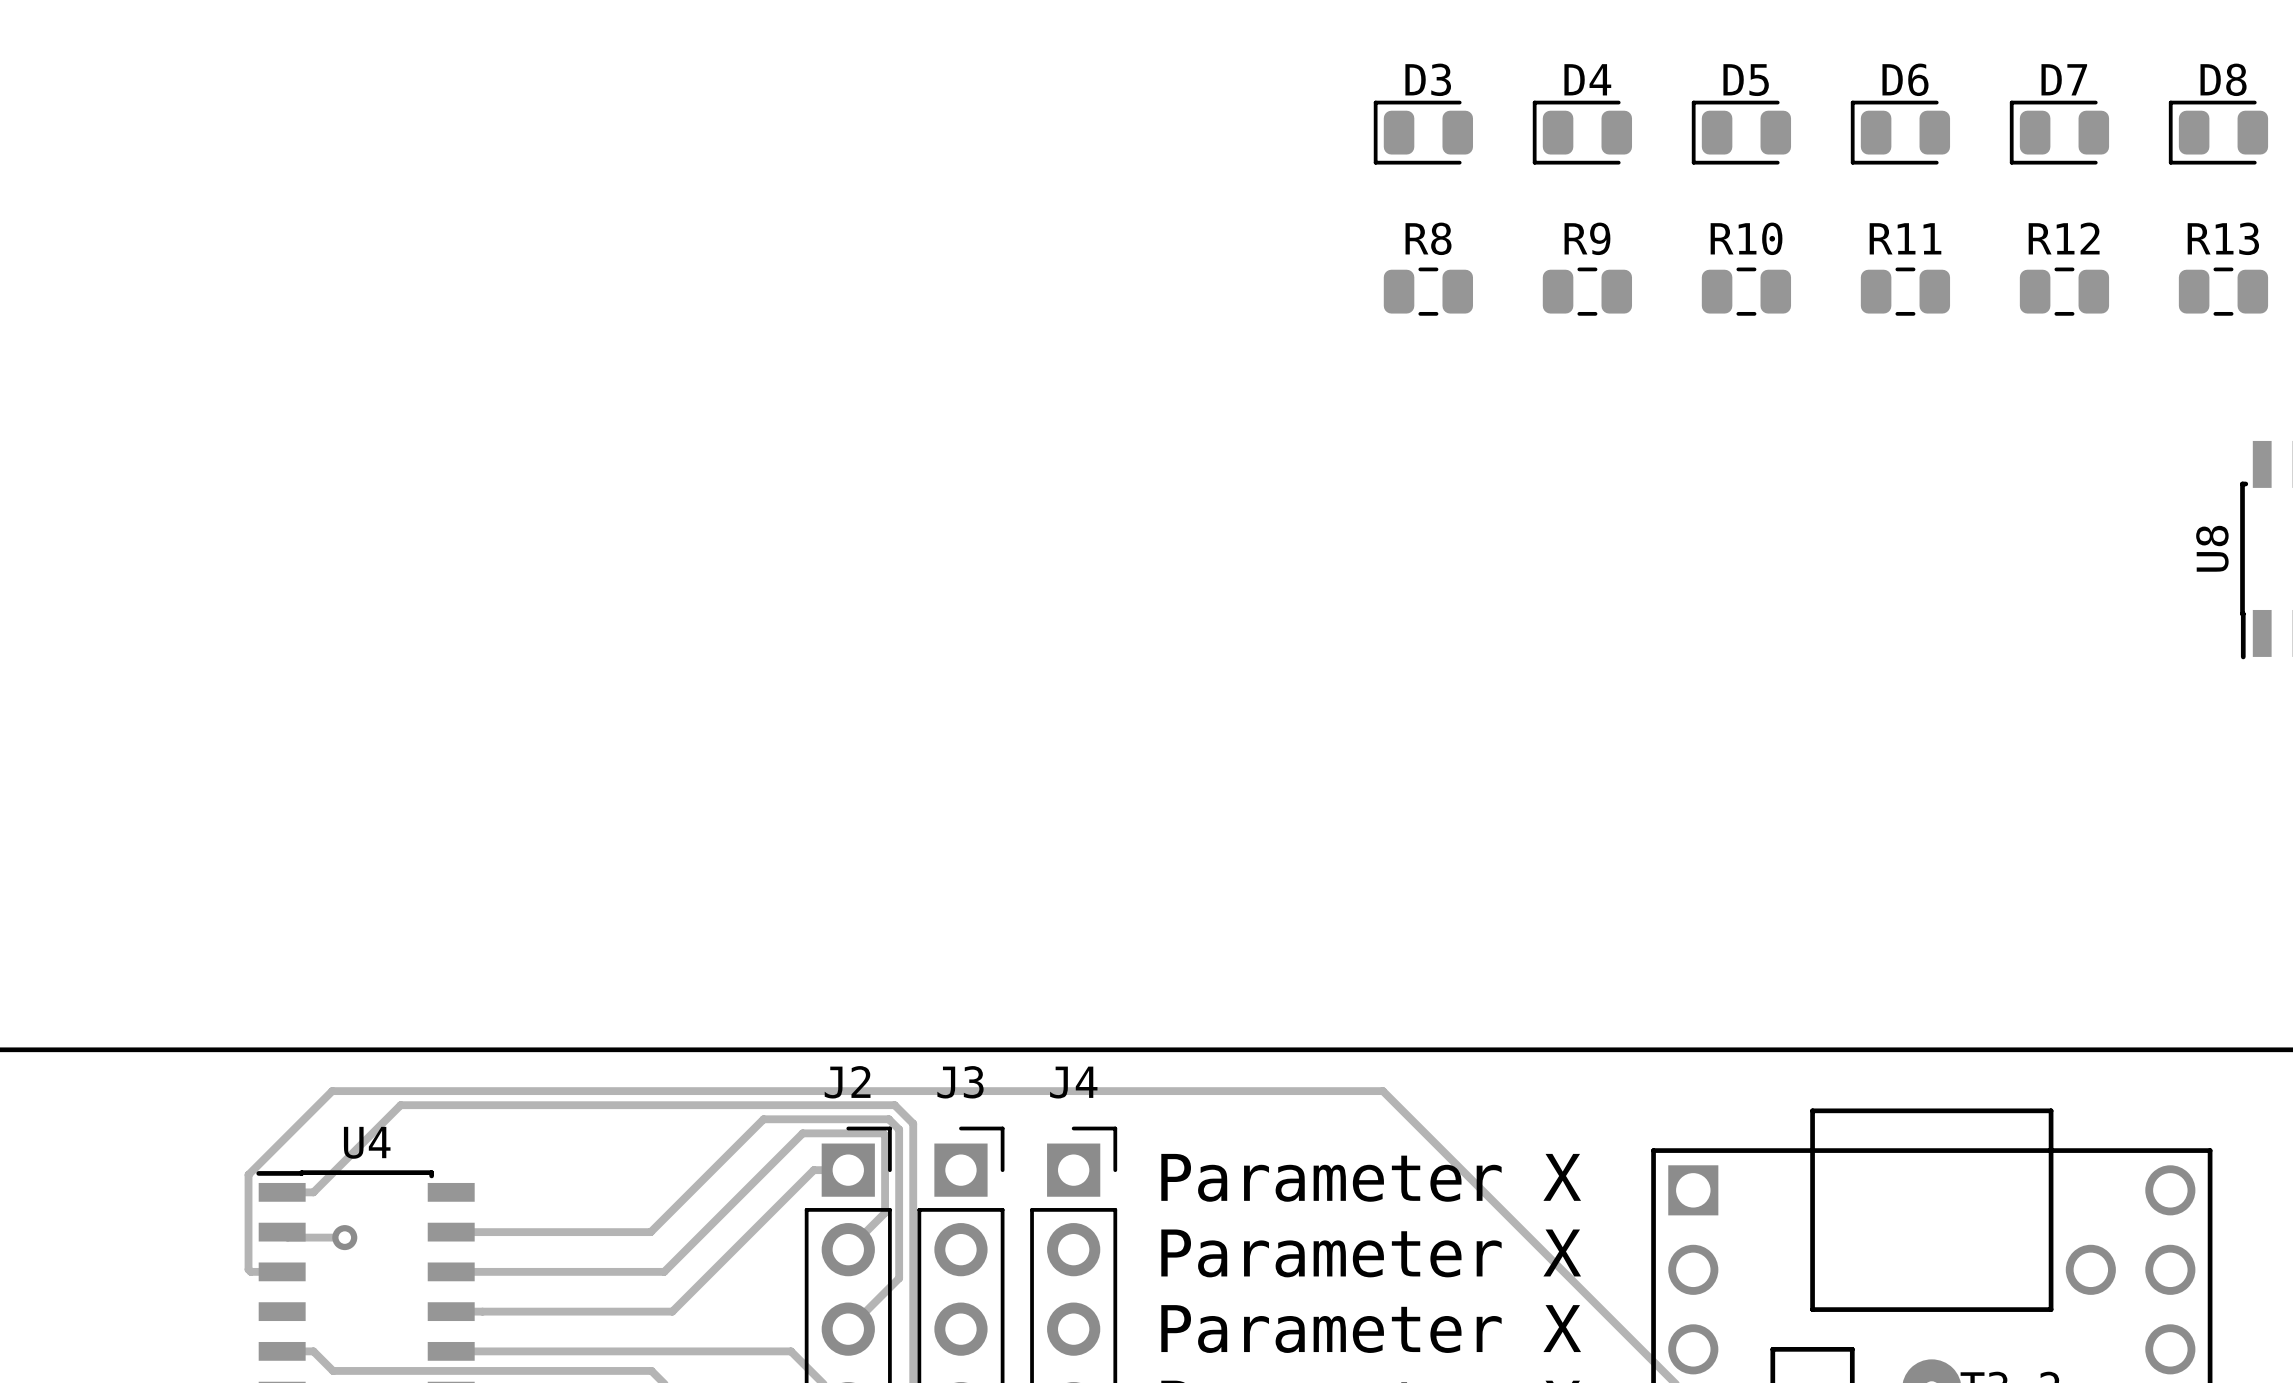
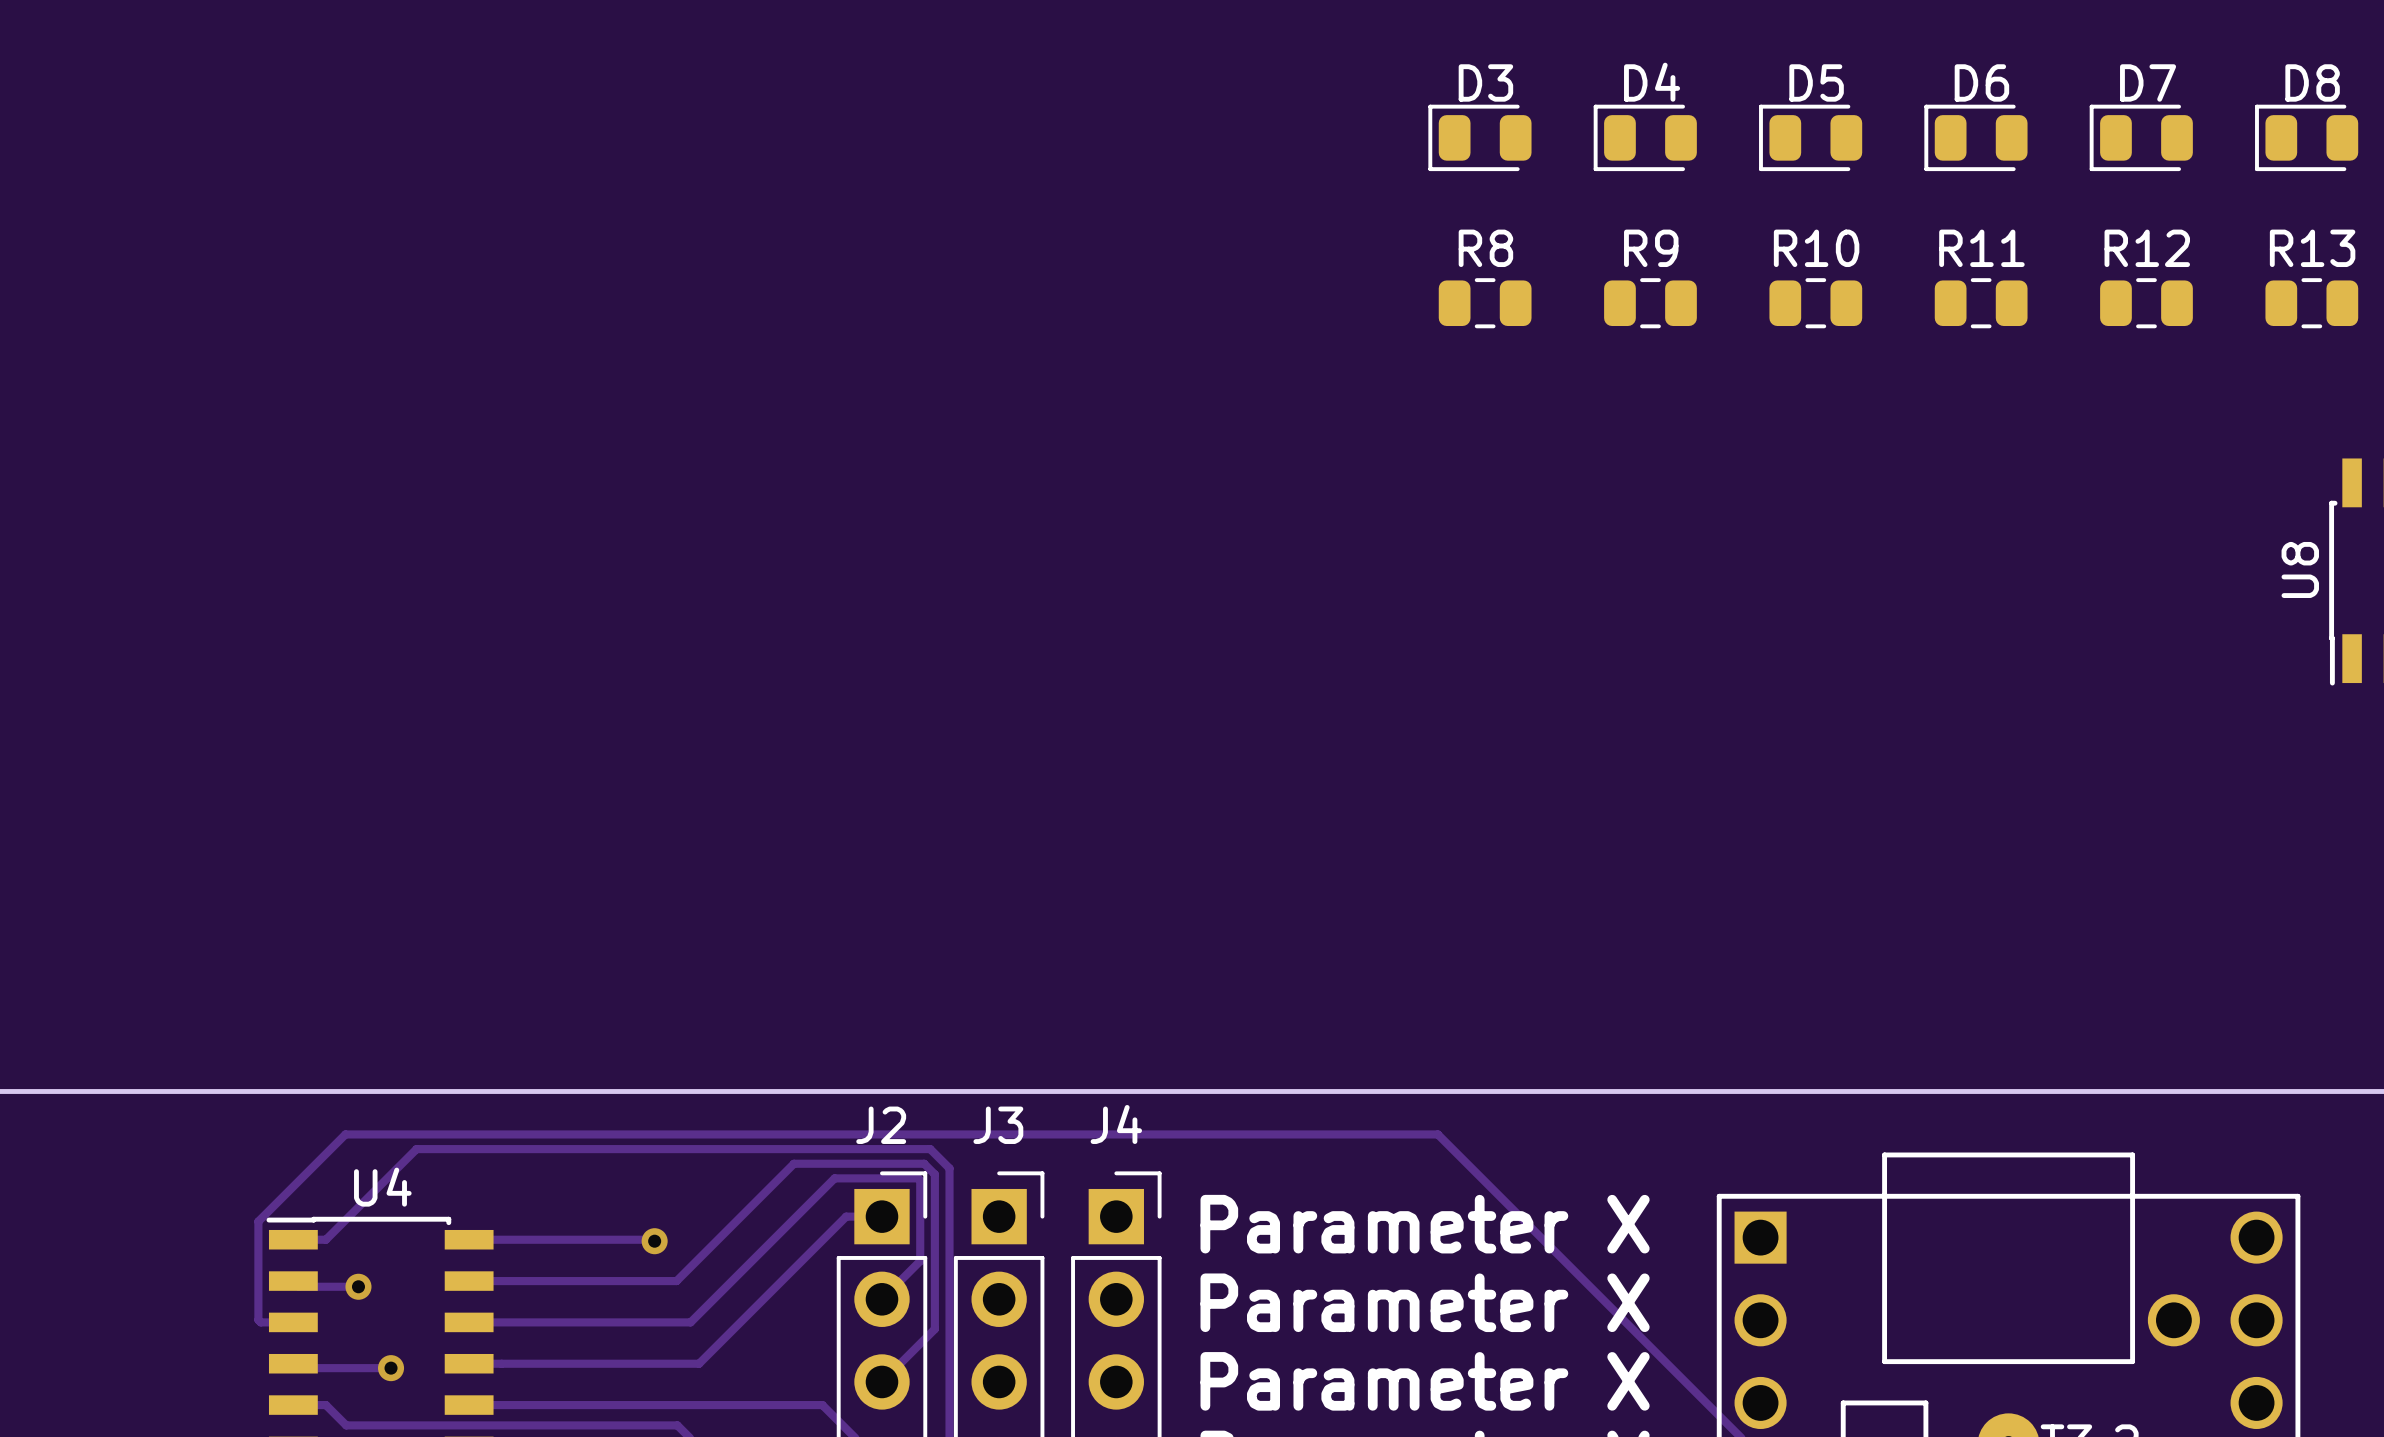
track: none -> (469, 1239) (654, 1241)
via: none -> (654, 1241)
track: none -> (293, 1363) (297, 1368) (391, 1368)
via: none -> (391, 1368)

